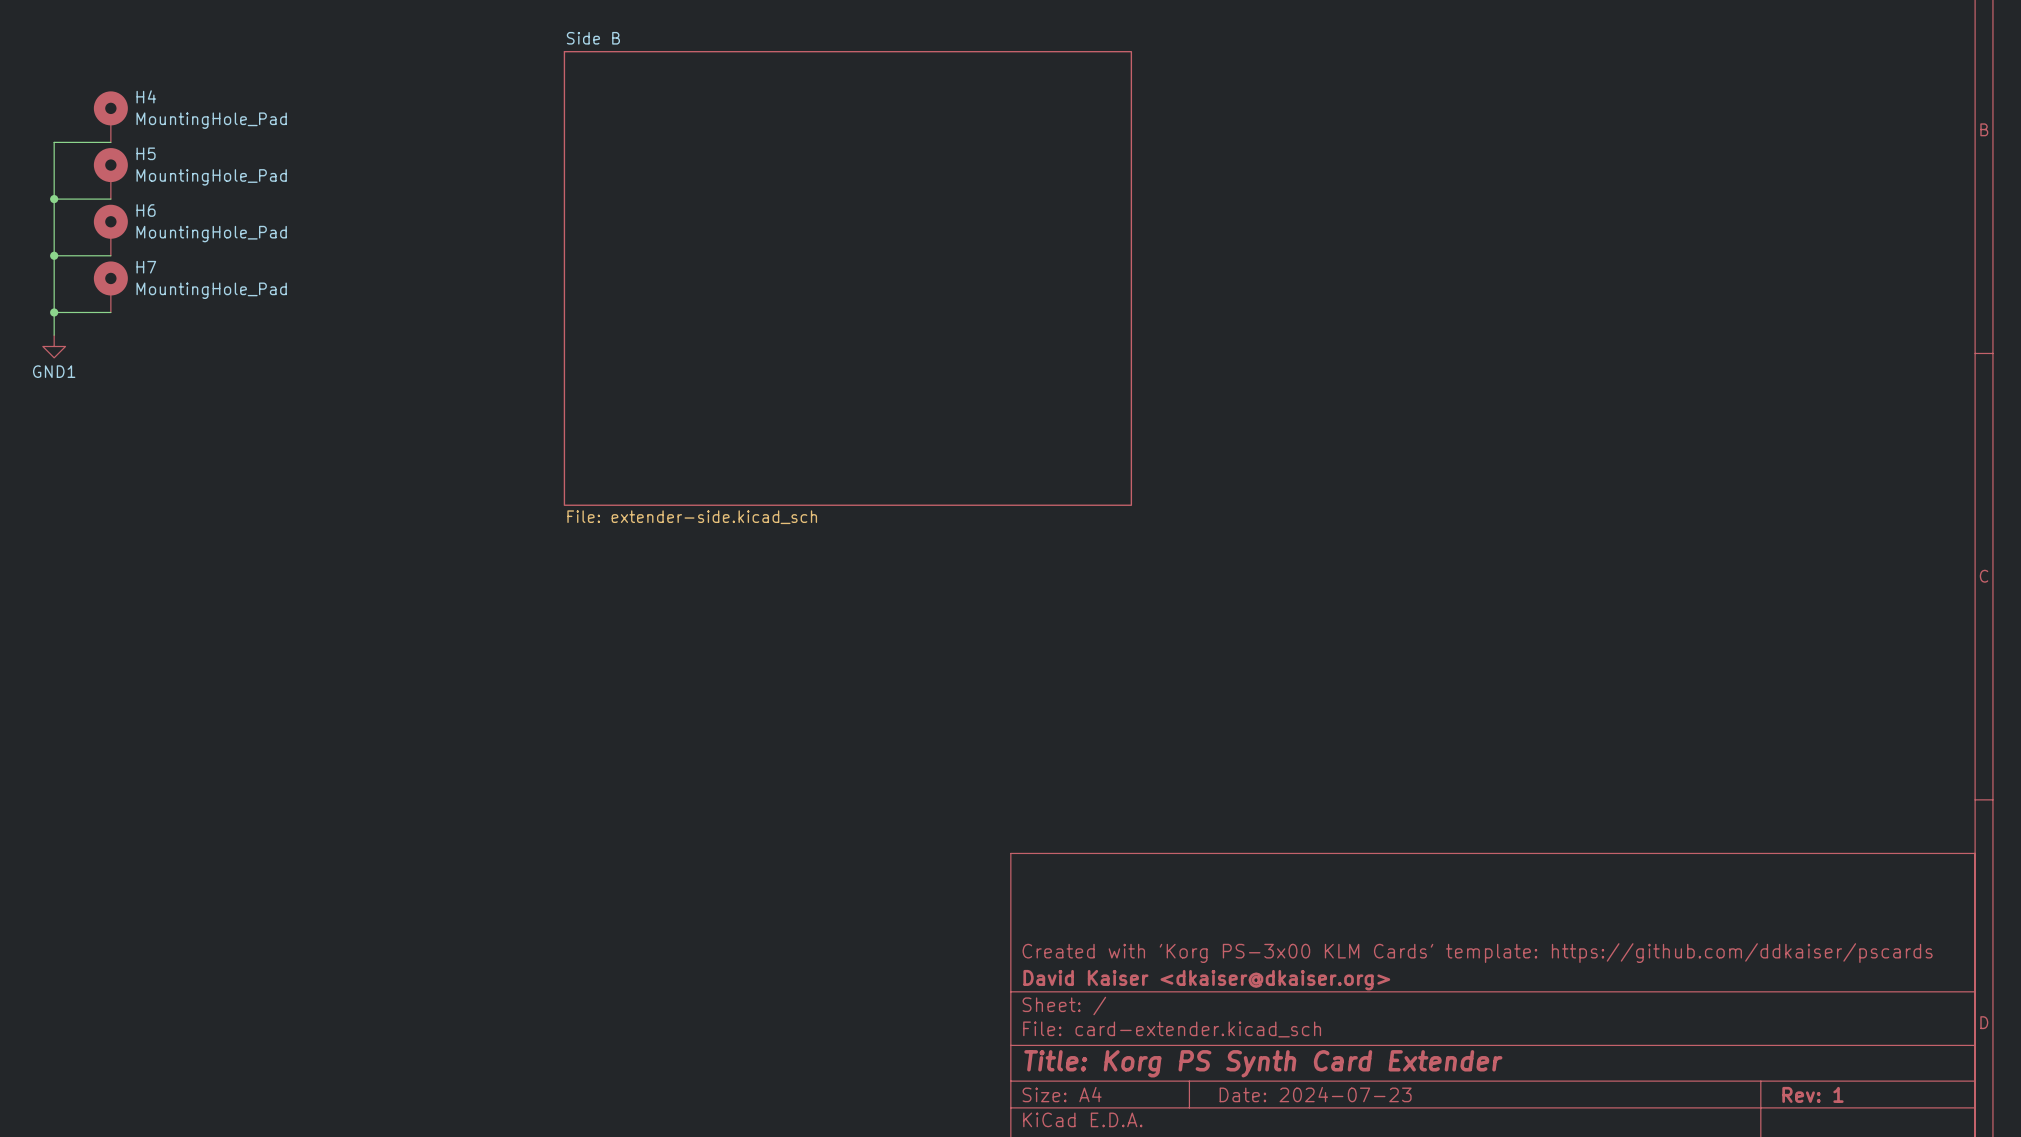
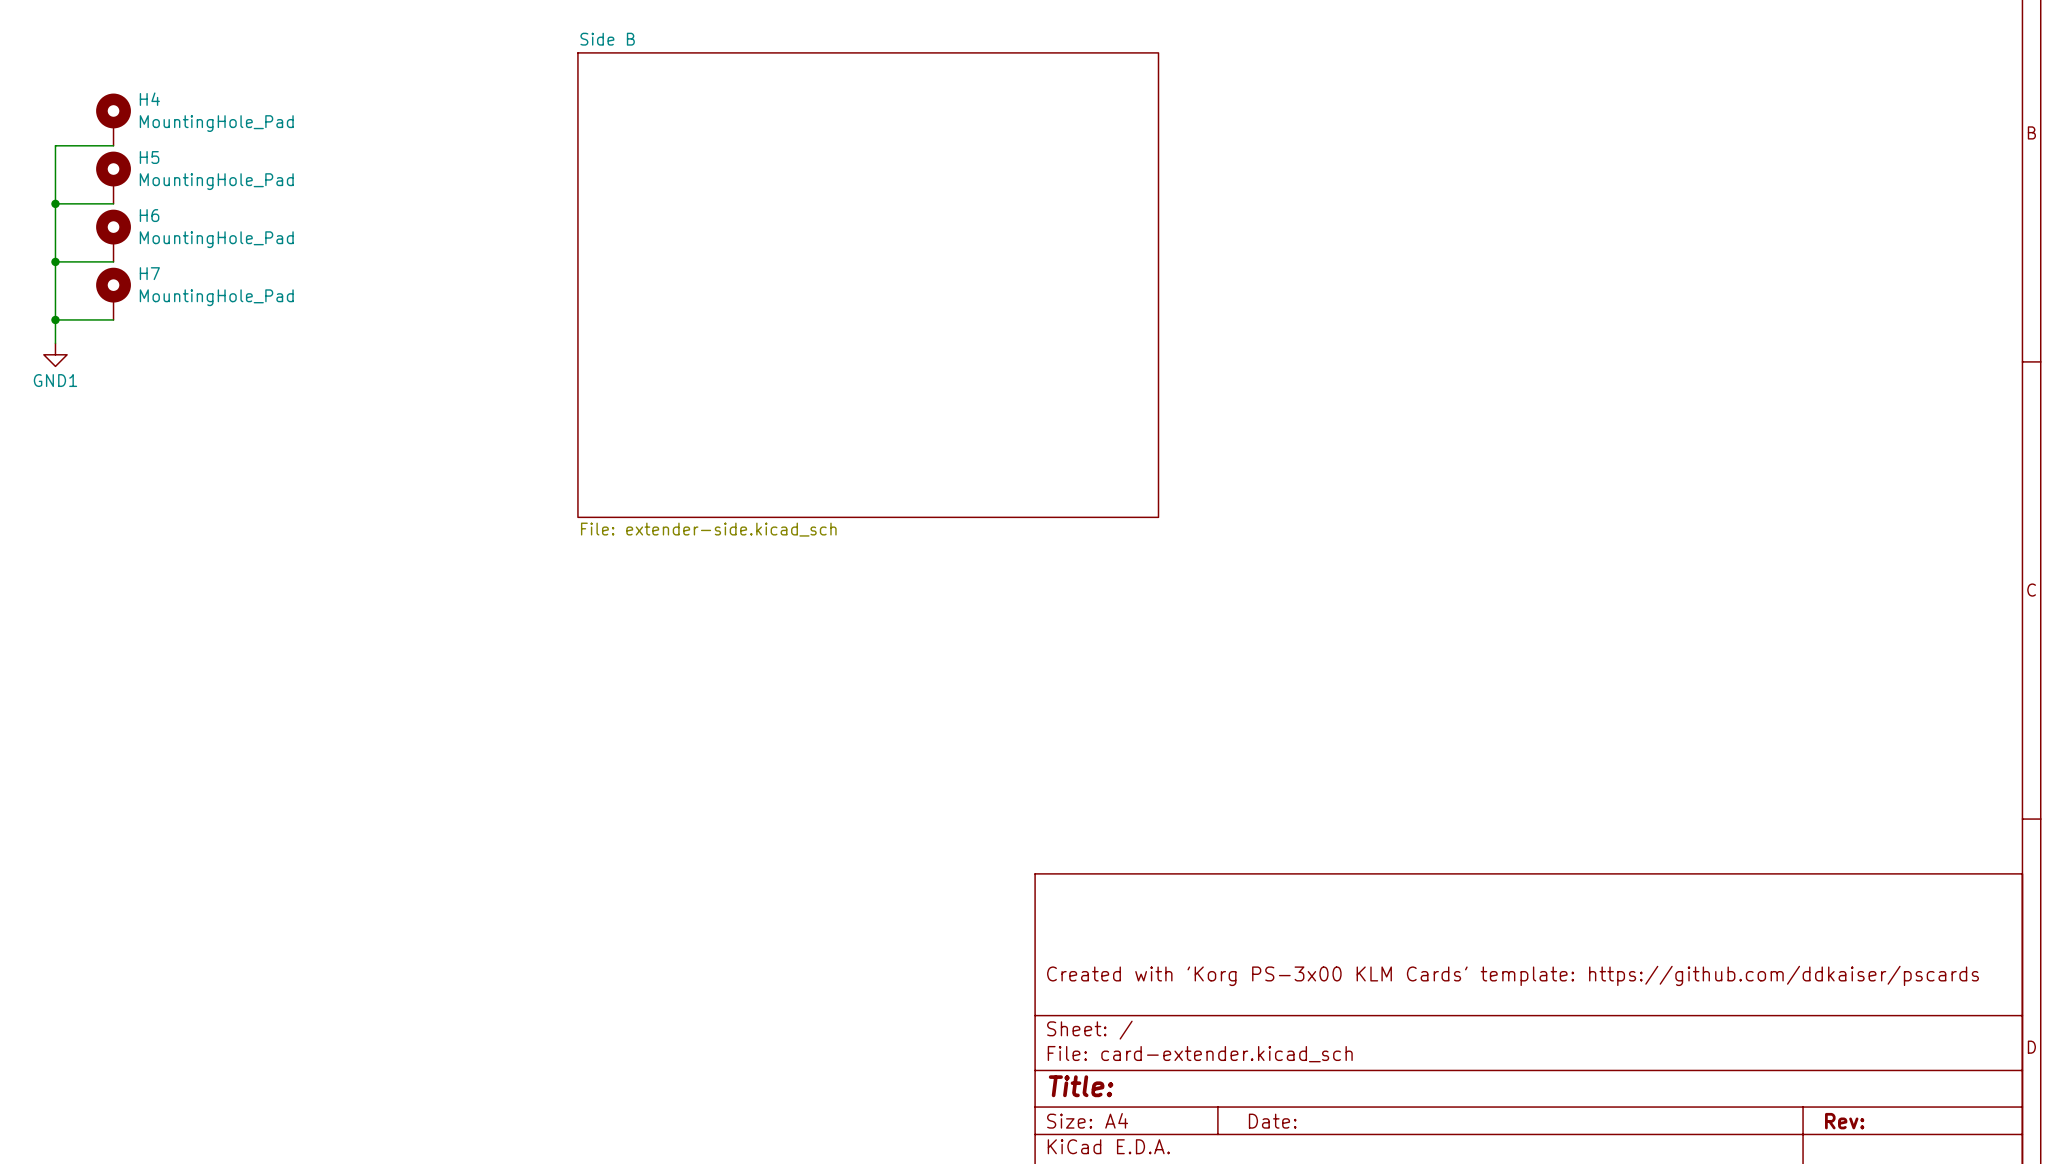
title block: David Kaiser <dkaiser@dkaiser.org> (1206, 980) -> none
title block: Title: Korg PS Synth Card Extender (1263, 1063) -> Title: (1081, 1086)
title block: Date: 2024-07-23 (1315, 1094) -> Date: (1272, 1121)
title block: Rev: 1 (1812, 1094) -> Rev: (1844, 1121)

